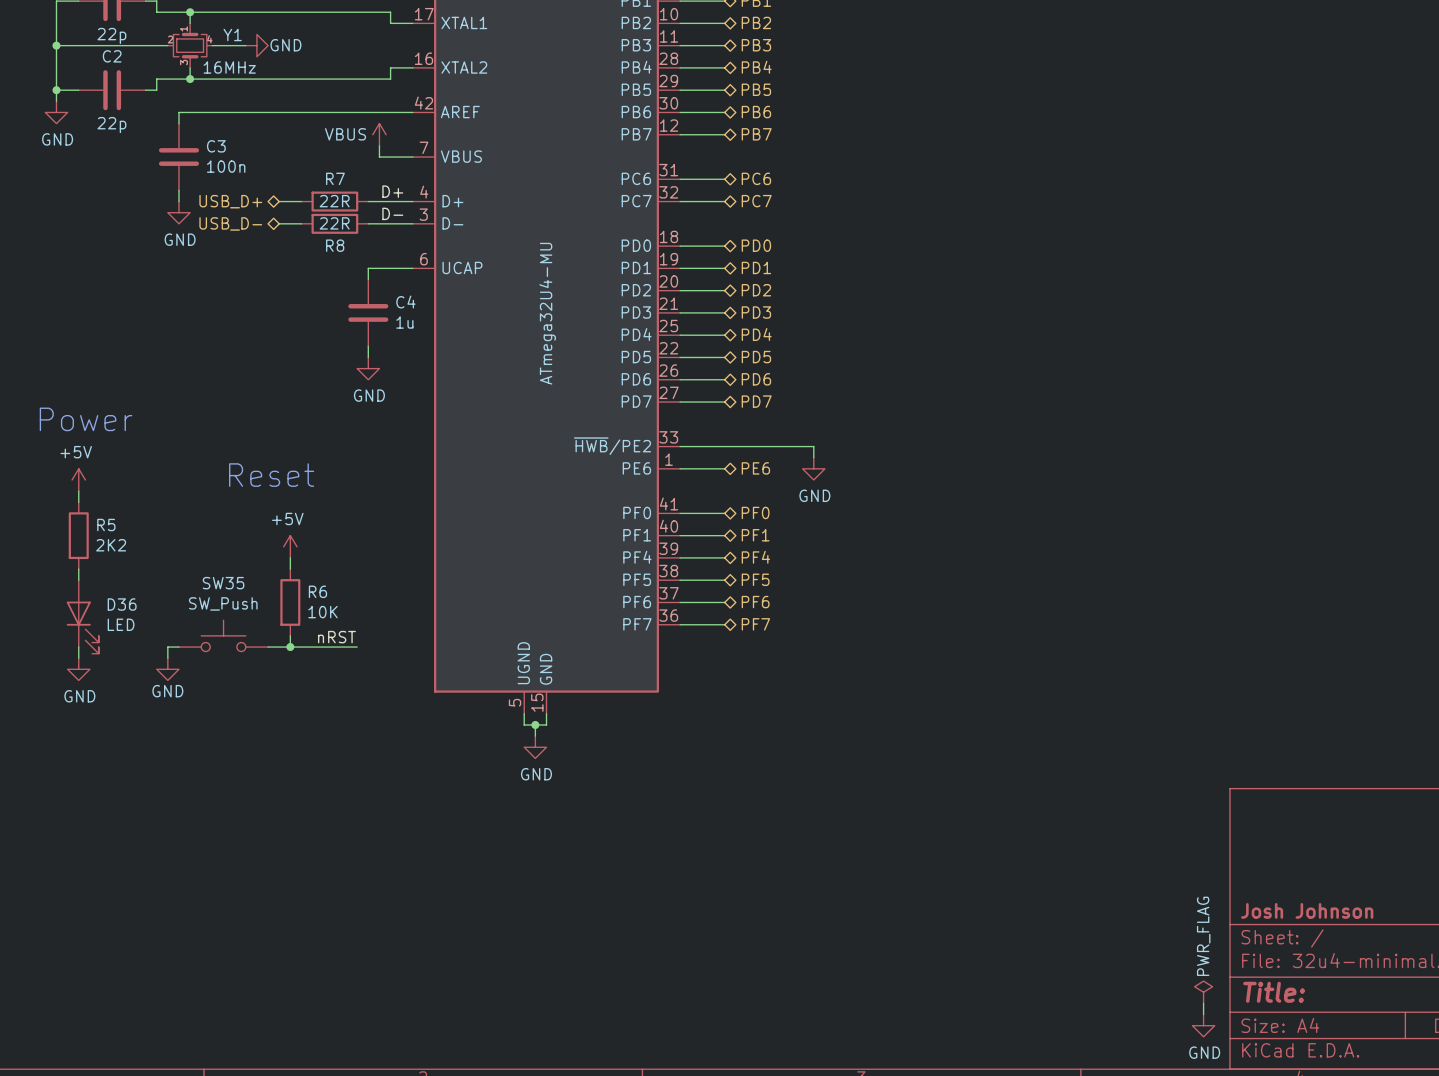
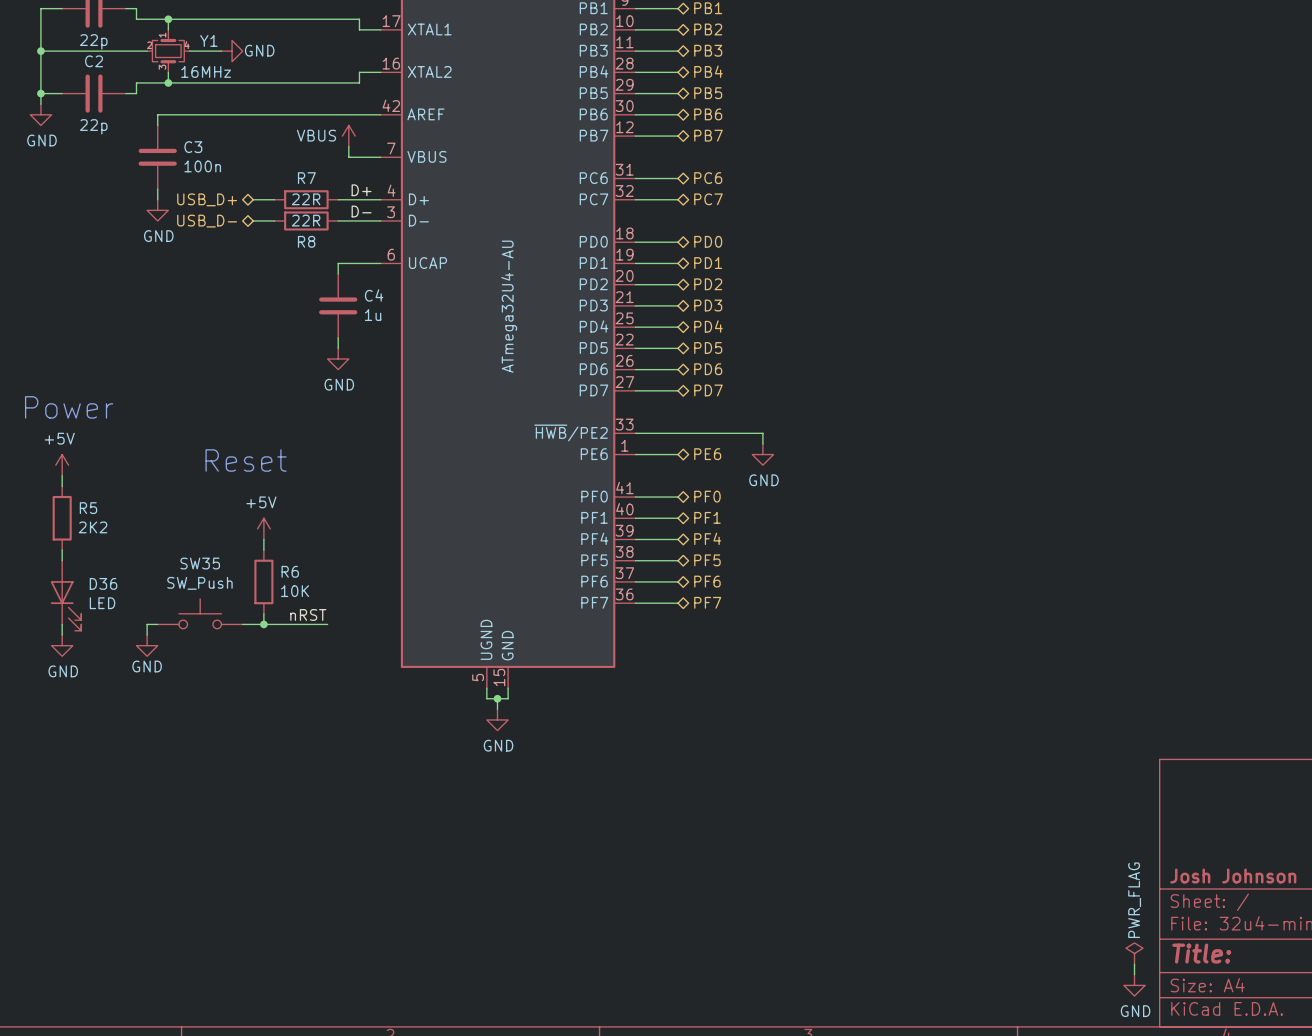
part value: ATmega32U4-MU (547, 313) -> ATmega32U4-AU (509, 306)

